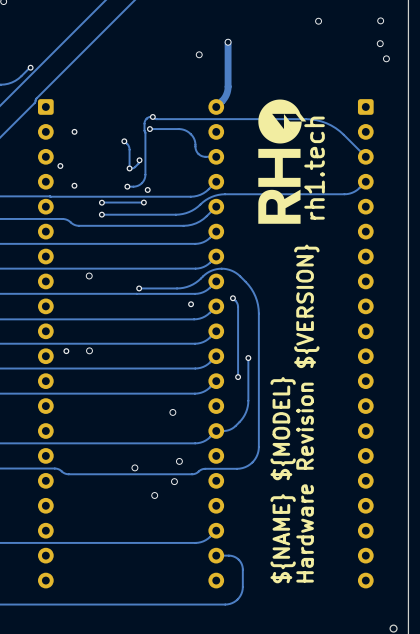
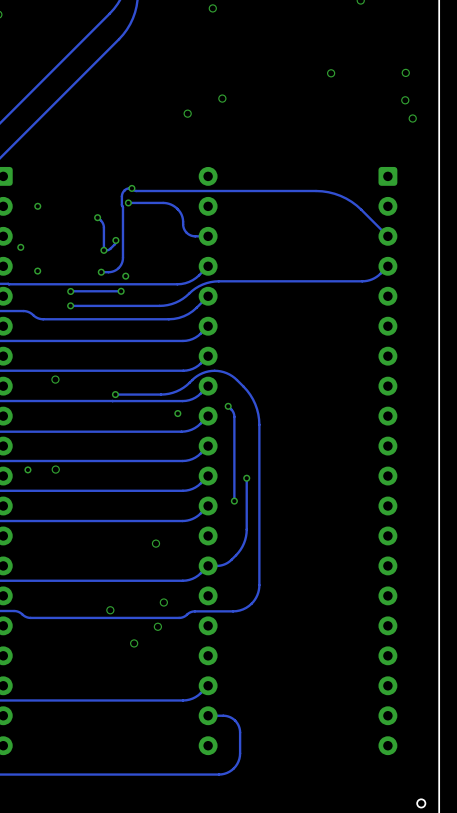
track: (228, 42) (227, 90) (224, 97) (216, 106) -> none
drawing: [258, 99, 307, 224] -> none
text: rh1.tech (314, 168) -> none
text: Hardware Revision ${VERSION} (306, 413) -> none
text: ${NAME} ${MODEL} (283, 480) -> none

